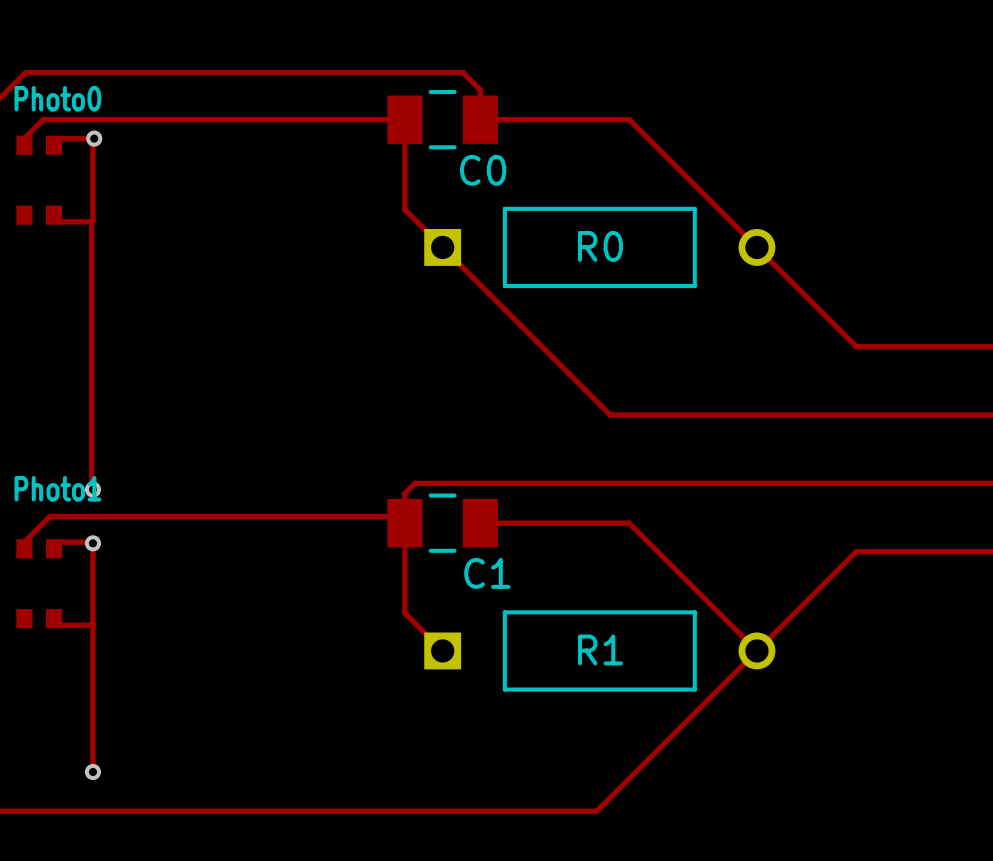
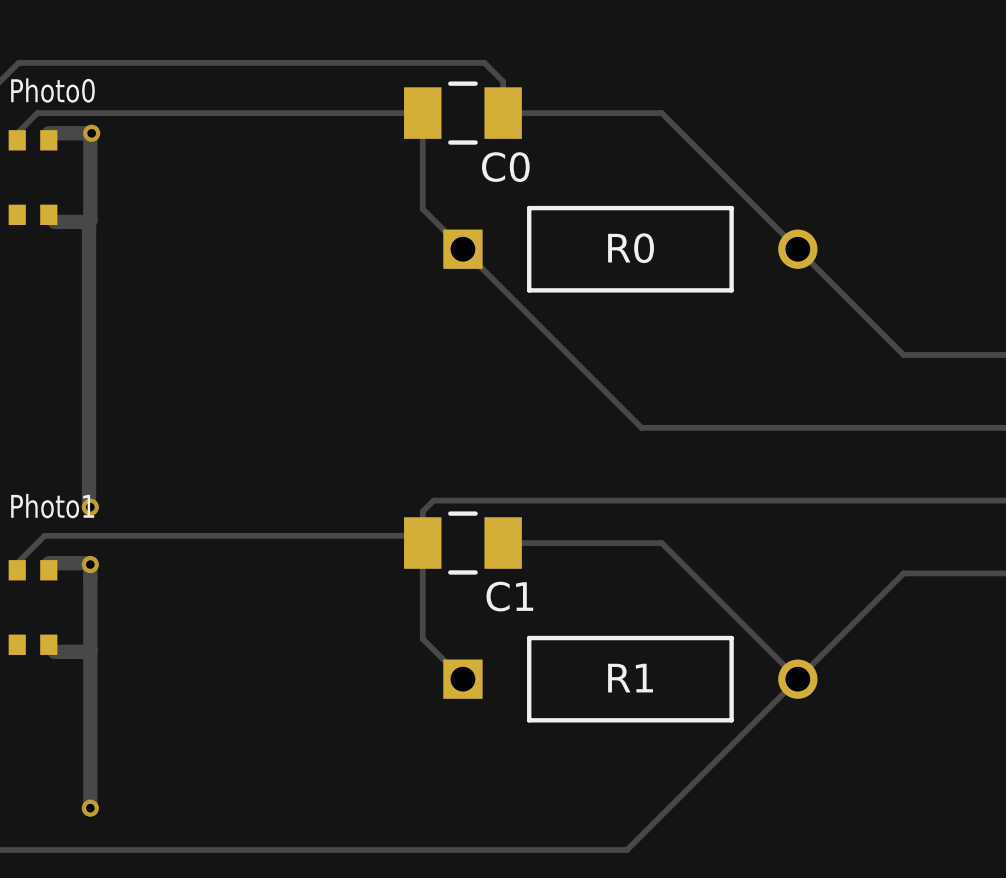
track width: thin (53, 138) (94, 138) (91, 221) -> thick (48, 133) (91, 133) (89, 221)
track width: thin (59, 221) (91, 221) -> thick (54, 221) (89, 221)
track width: thin (91, 221) (92, 489) -> thick (89, 221) (90, 507)
track width: thin (53, 542) (92, 543) (92, 772) -> thick (48, 563) (90, 564) (90, 808)
track width: thin (92, 624) (59, 625) -> thick (90, 650) (54, 651)

